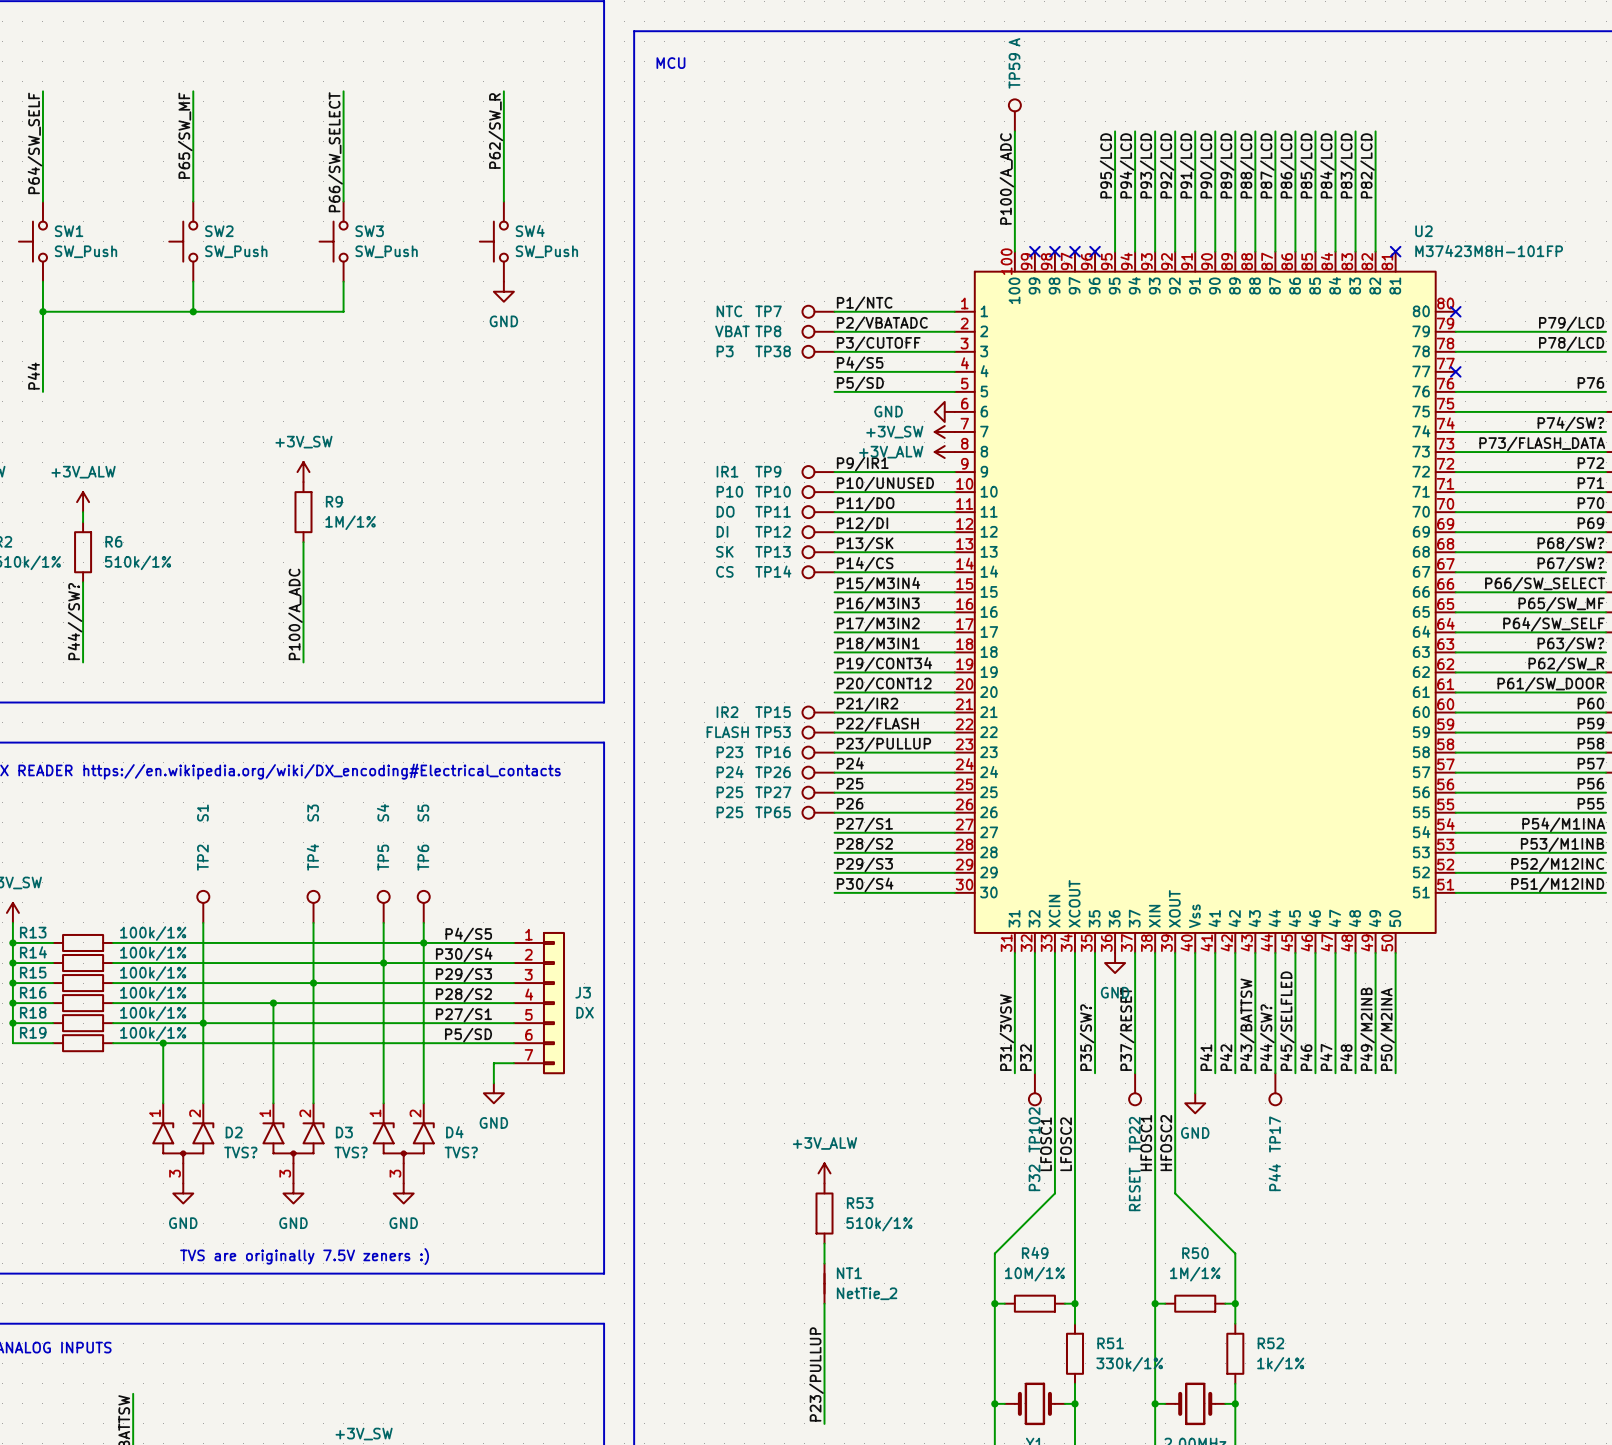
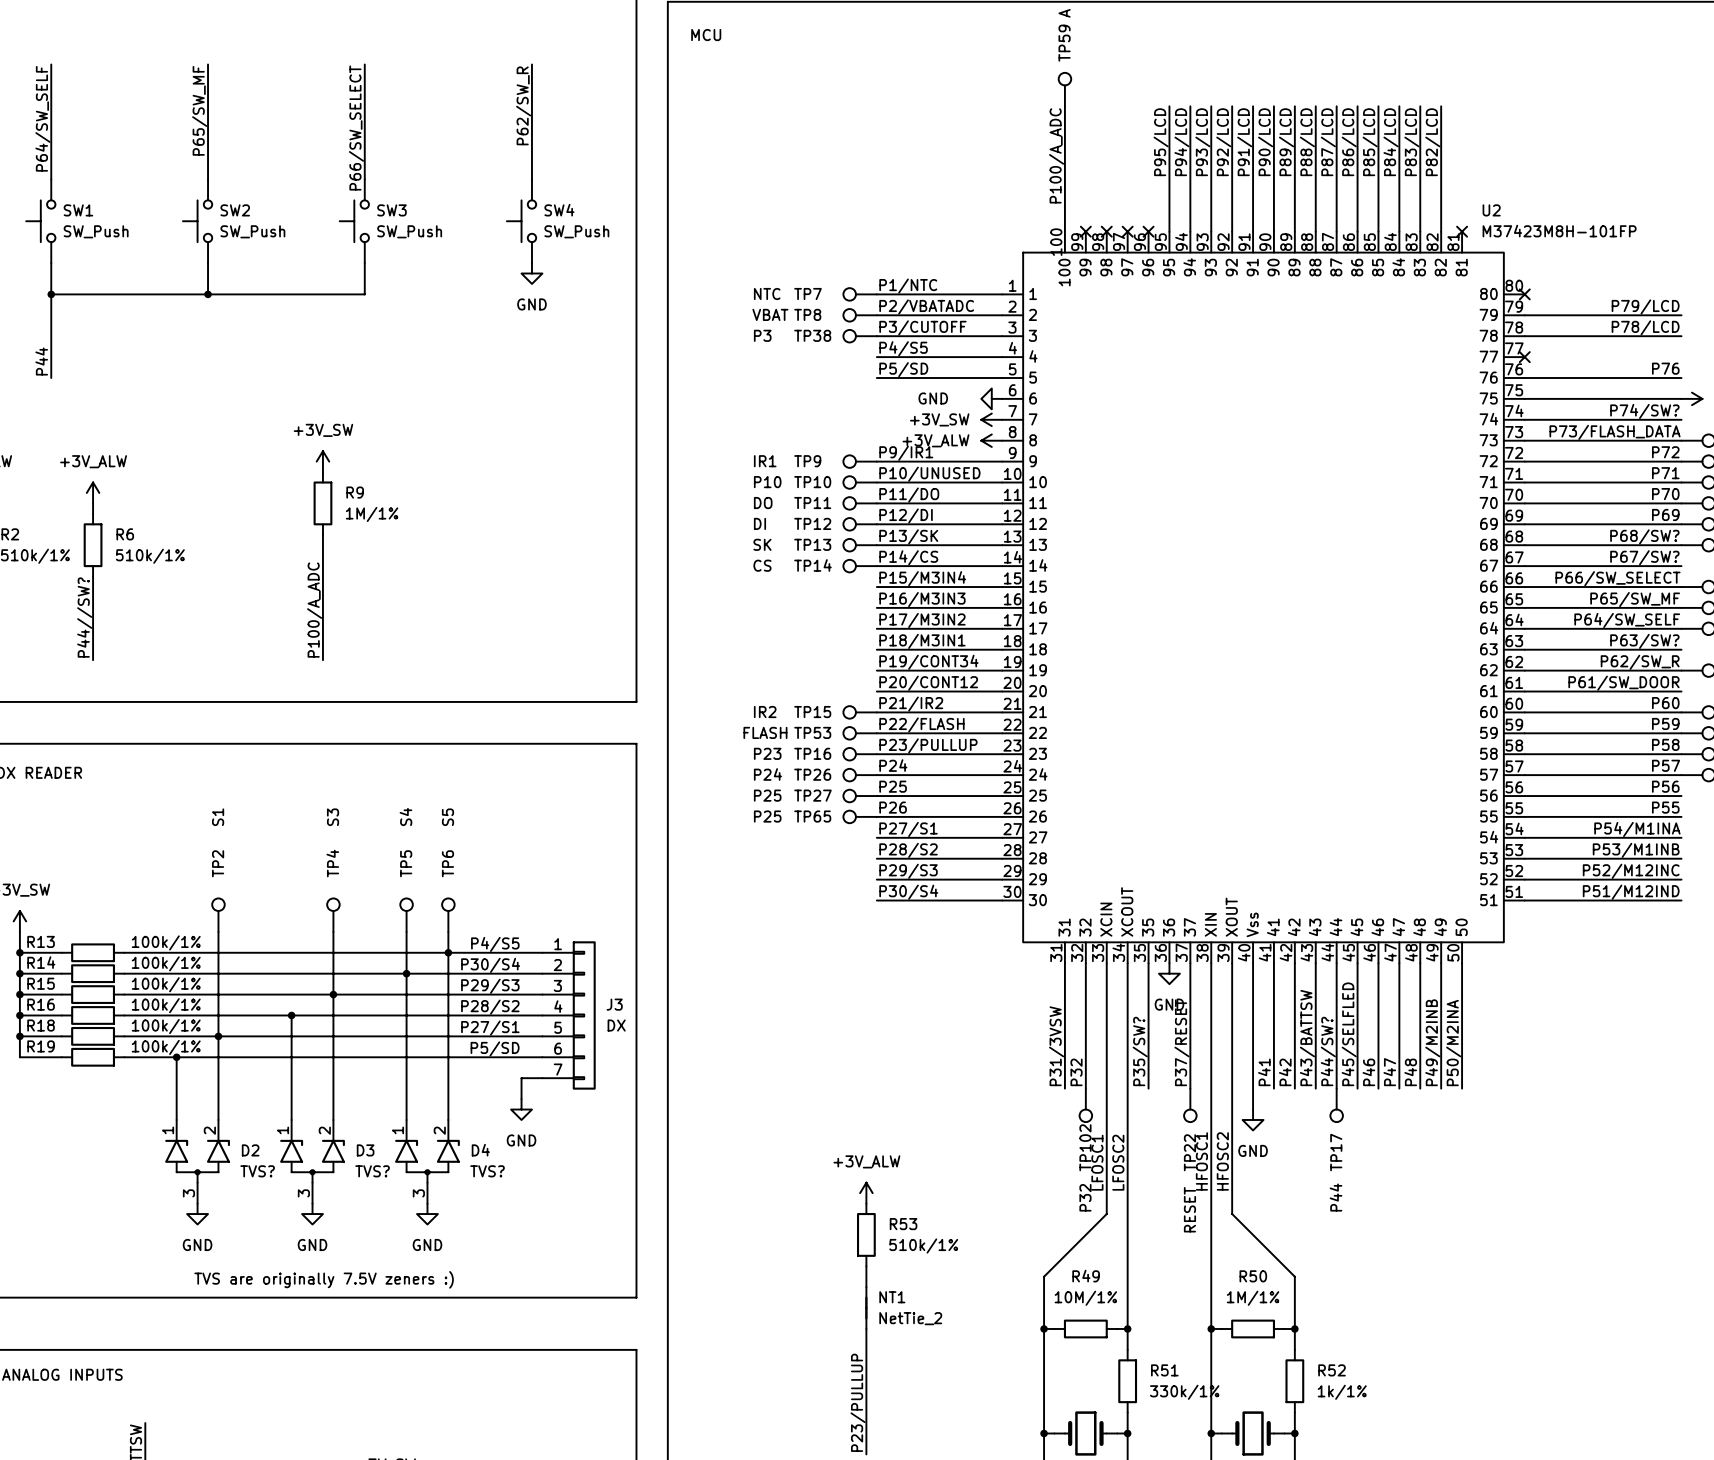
text: https://en.wikipedia.org/wiki/DX_encoding#Electrical_contacts (322, 771) -> none

